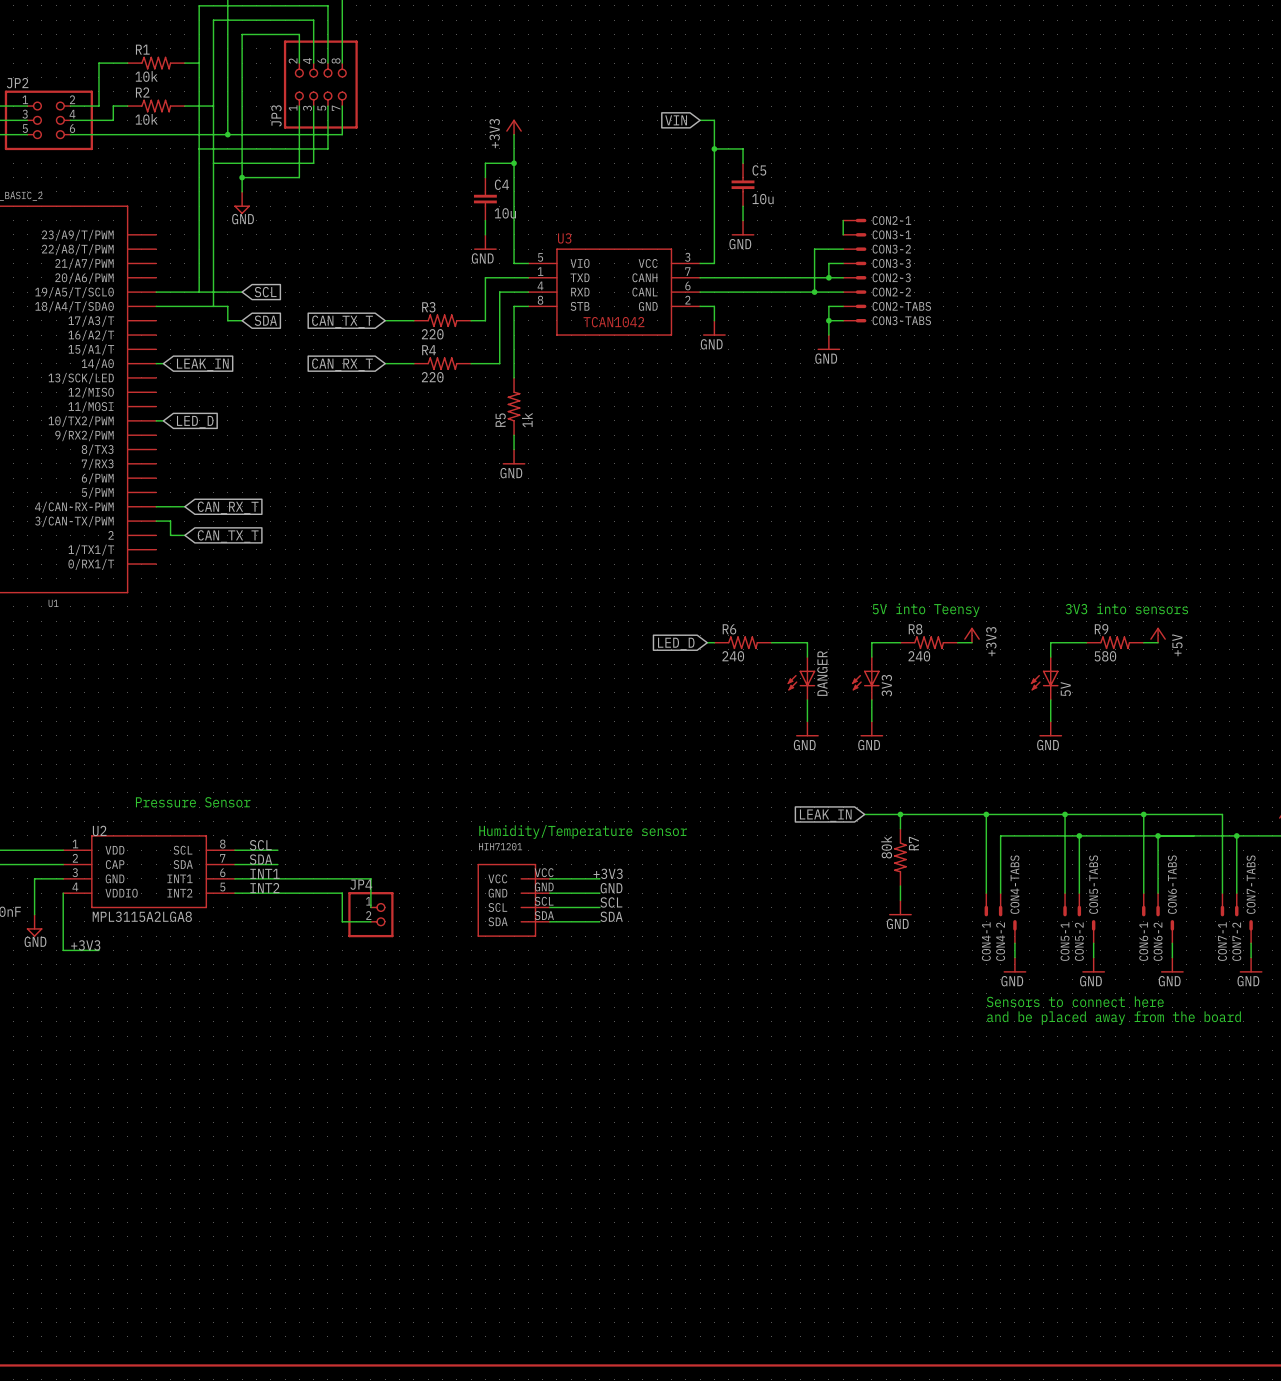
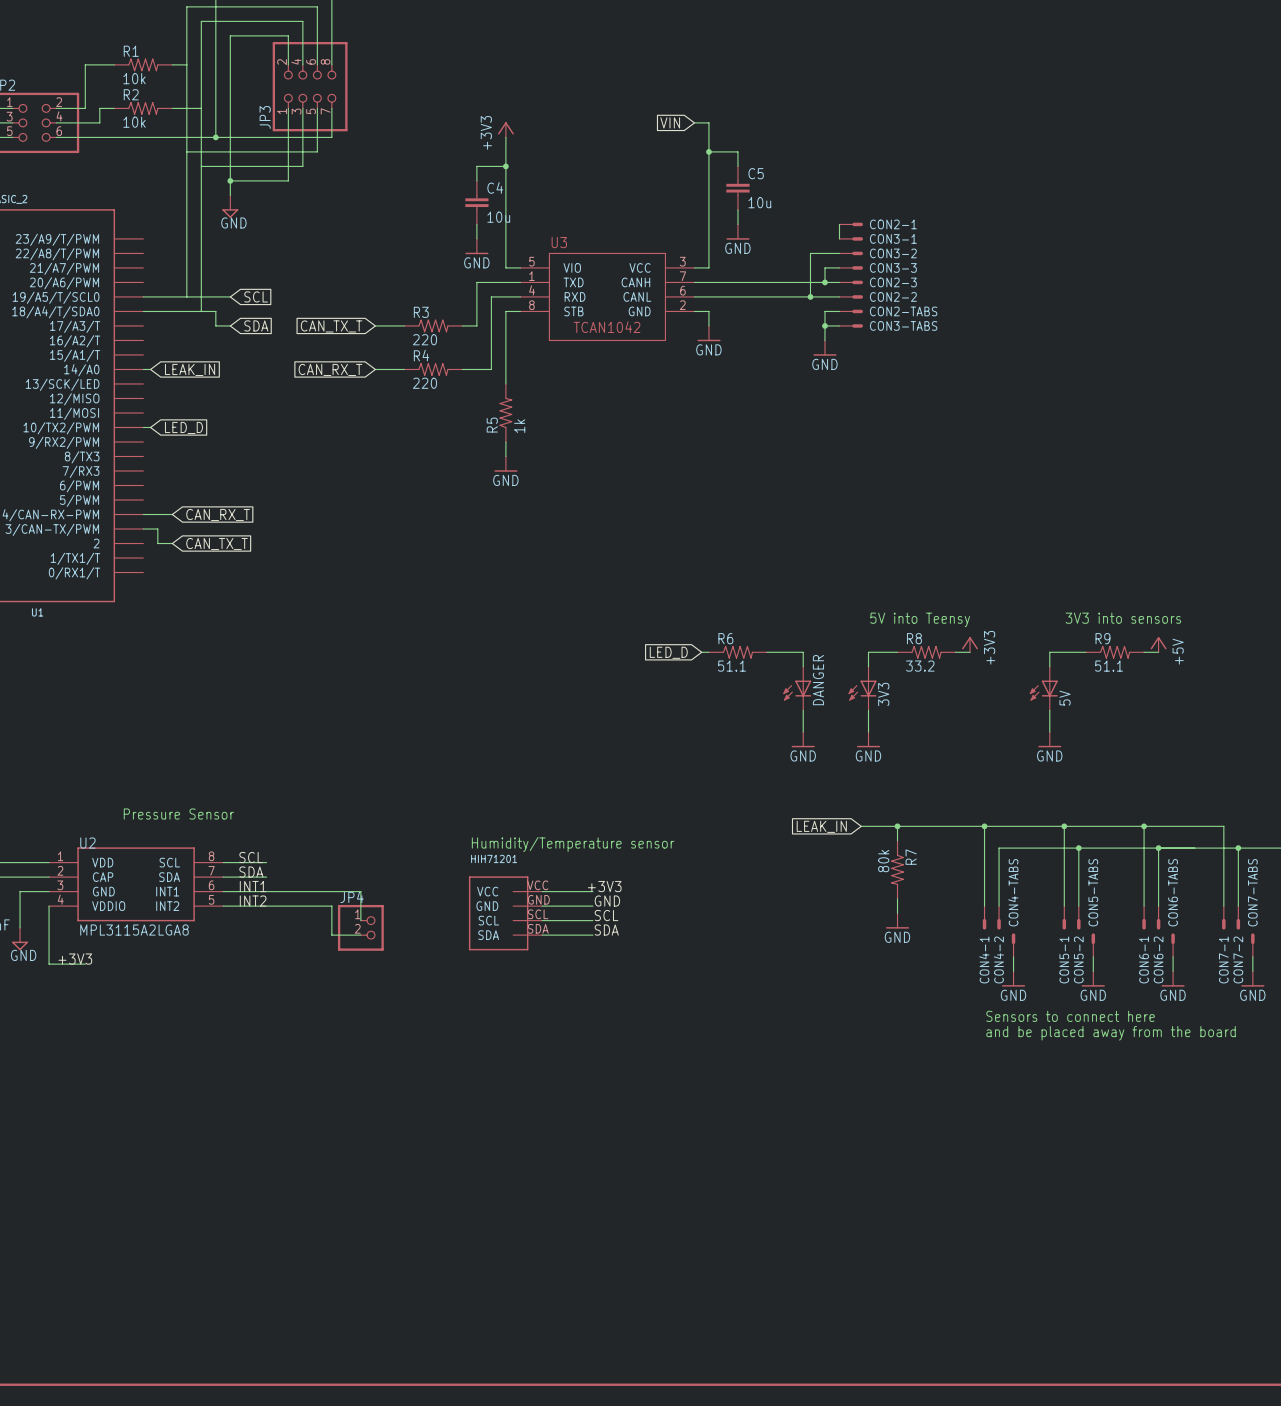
R6 value: 240 (733, 656) -> 51.1 (731, 666)
R8 value: 240 (919, 656) -> 33.2 (920, 666)
R9 value: 580 (1105, 656) -> 51.1 (1109, 666)

